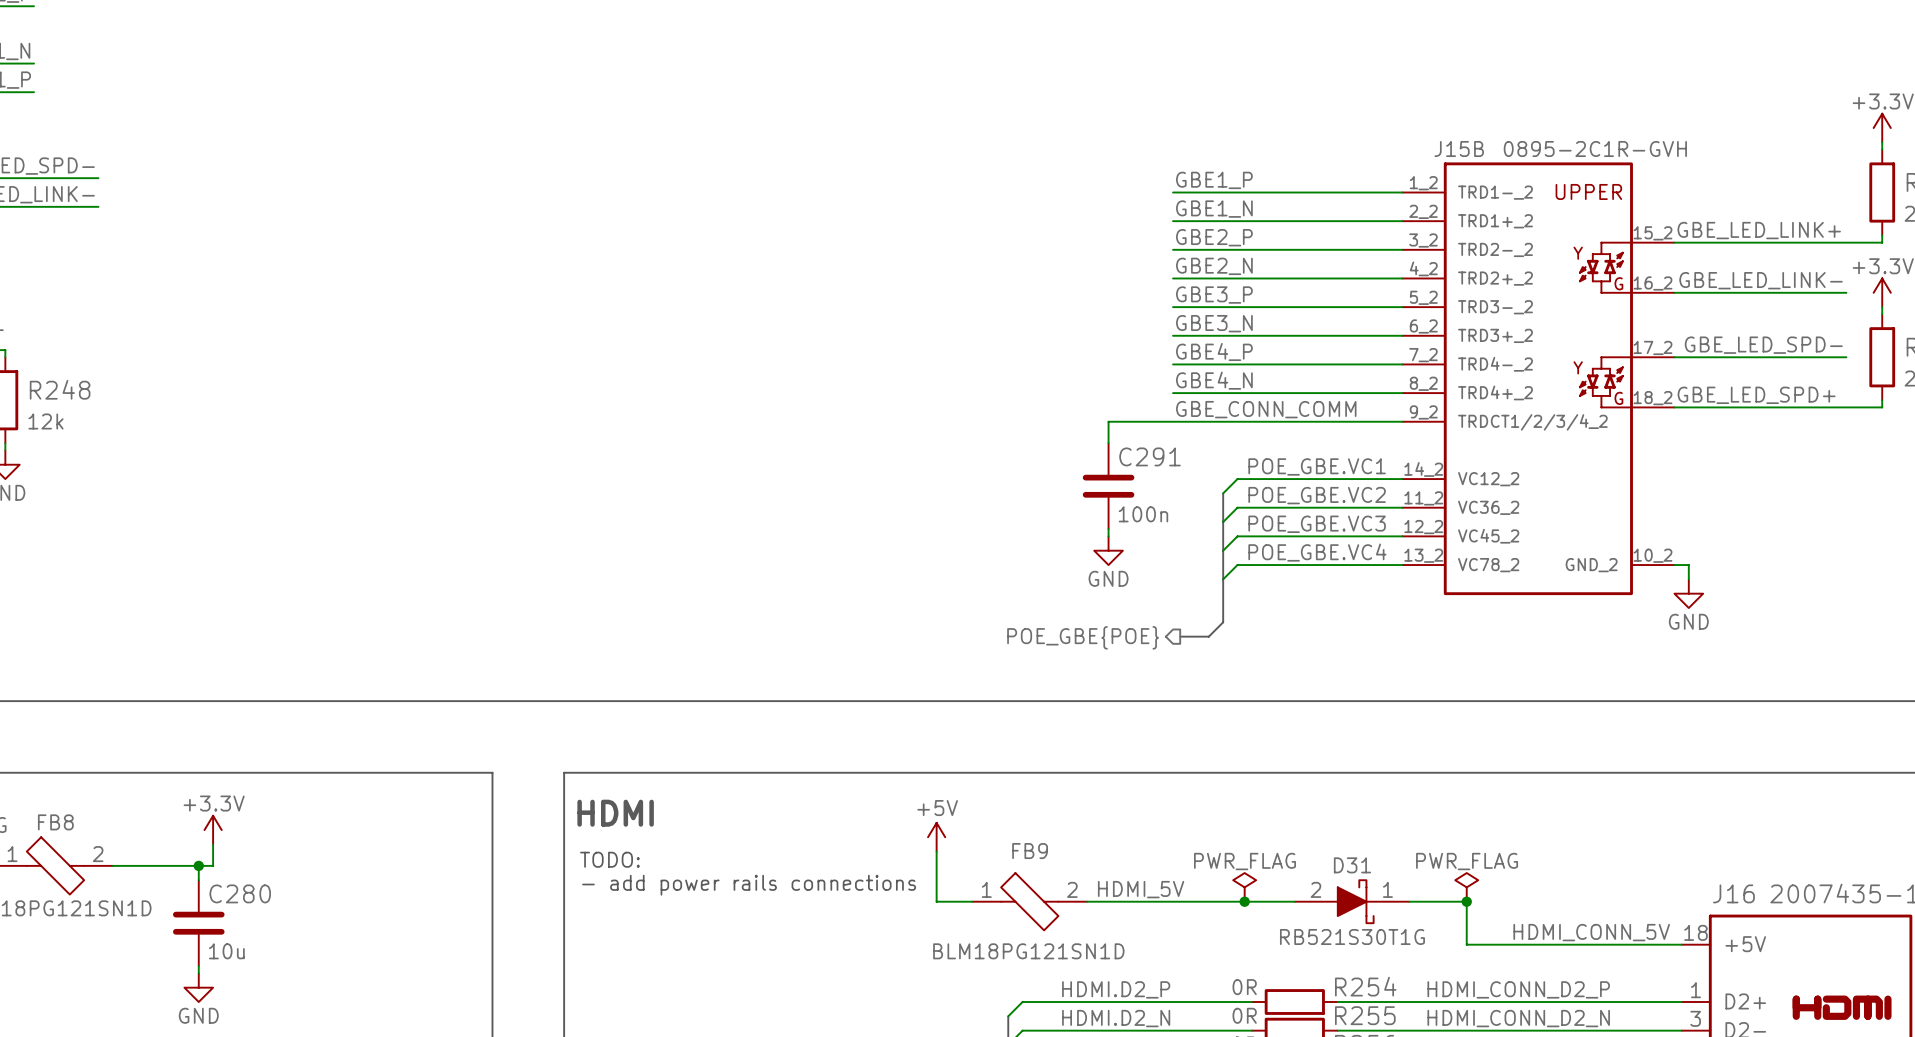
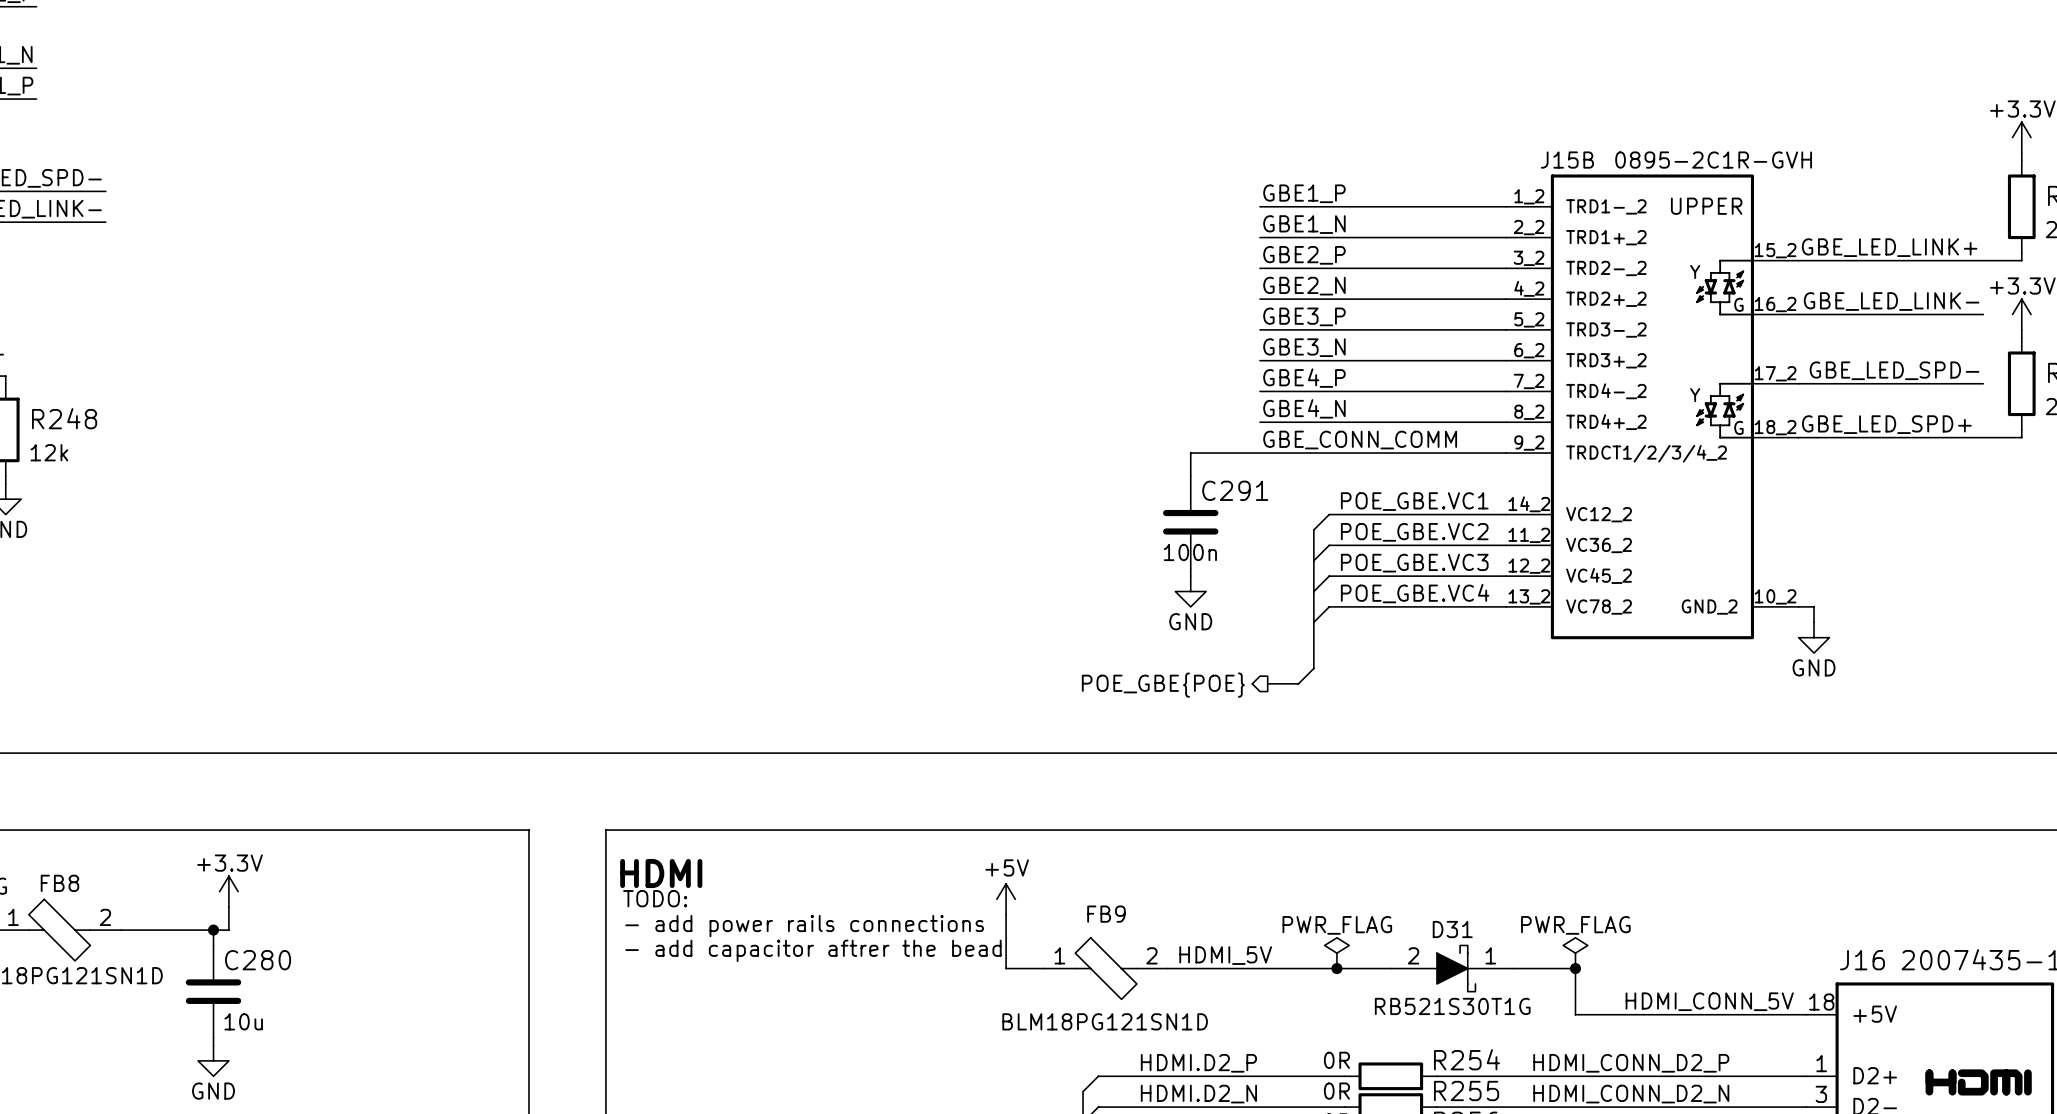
C291 text position: 100n (1143, 514) -> 100n (1190, 552)
text: none -> TODO: (655, 898)
text: TODO: (609, 859) -> - add power rails connections (804, 926)
text: - add power rails connections (749, 885) -> - add capacitor aftrer the bead (813, 950)

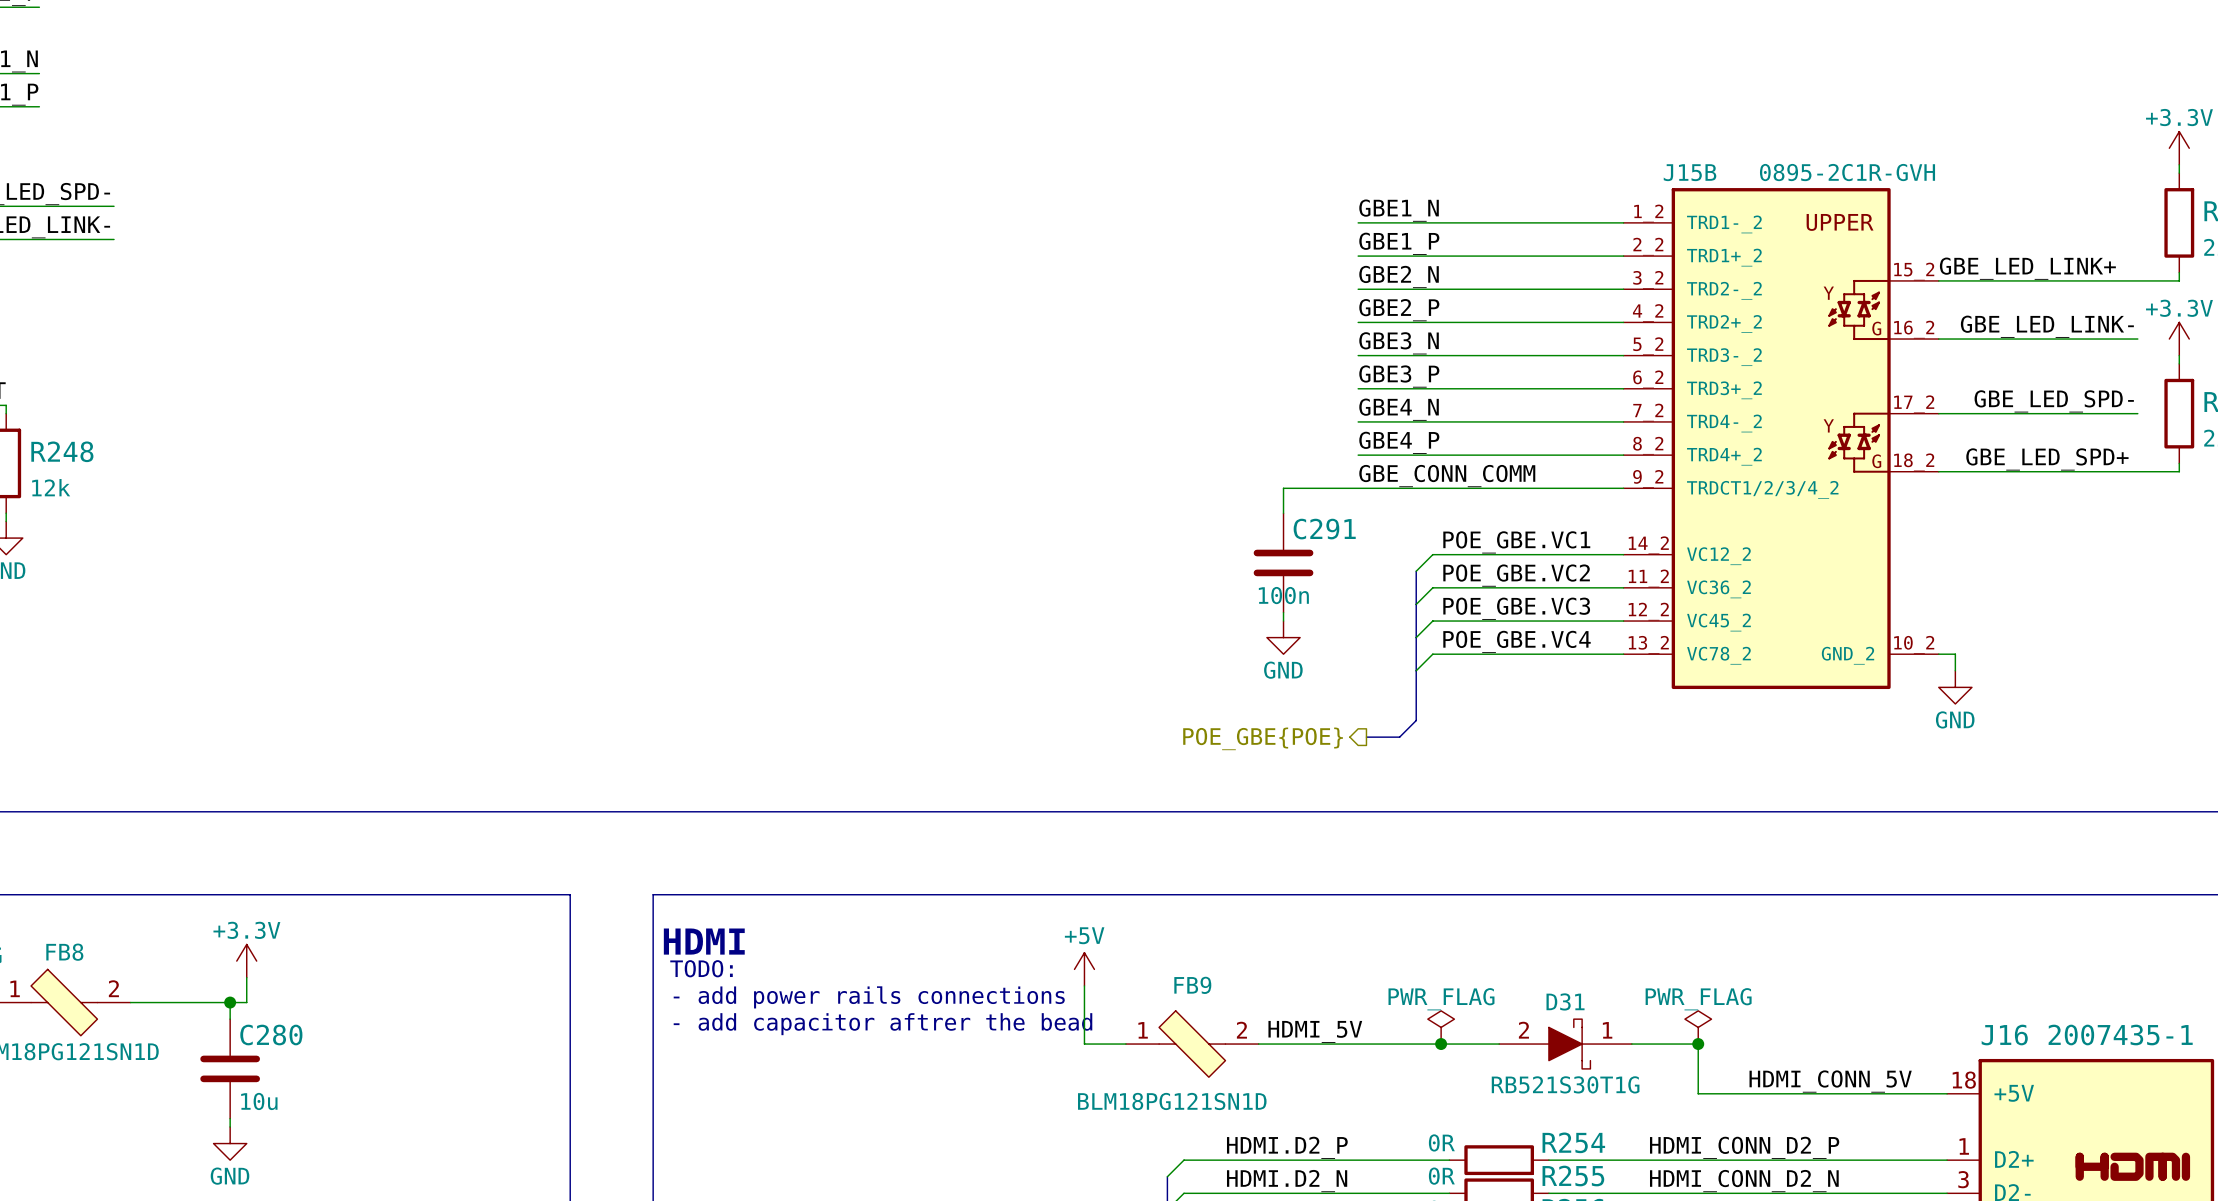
label: GBE1_P (1304, 193) -> GBE1_N (1399, 210)
label: GBE1_N (1304, 224) -> GBE1_P (1399, 243)
label: GBE2_P (1304, 255) -> GBE2_N (1399, 276)
label: GBE2_N (1304, 286) -> GBE2_P (1399, 310)
label: GBE3_P (1304, 316) -> GBE3_N (1399, 343)
label: GBE3_N (1304, 347) -> GBE3_P (1399, 376)
label: GBE4_P (1304, 378) -> GBE4_N (1399, 409)
label: GBE4_N (1304, 408) -> GBE4_P (1399, 442)

